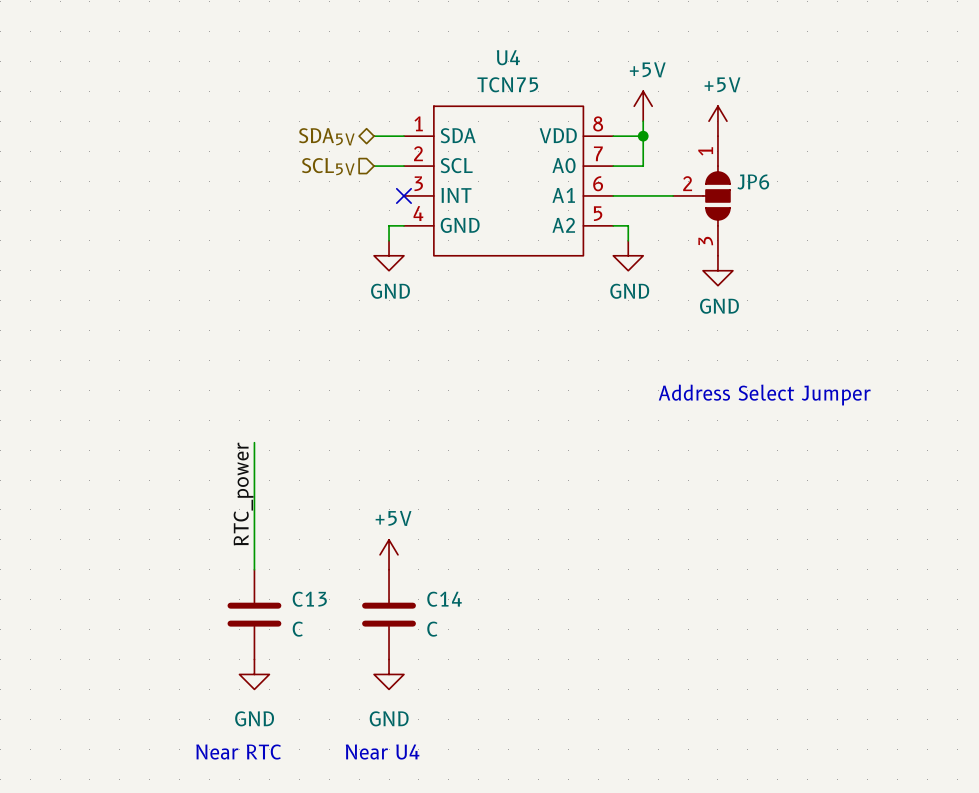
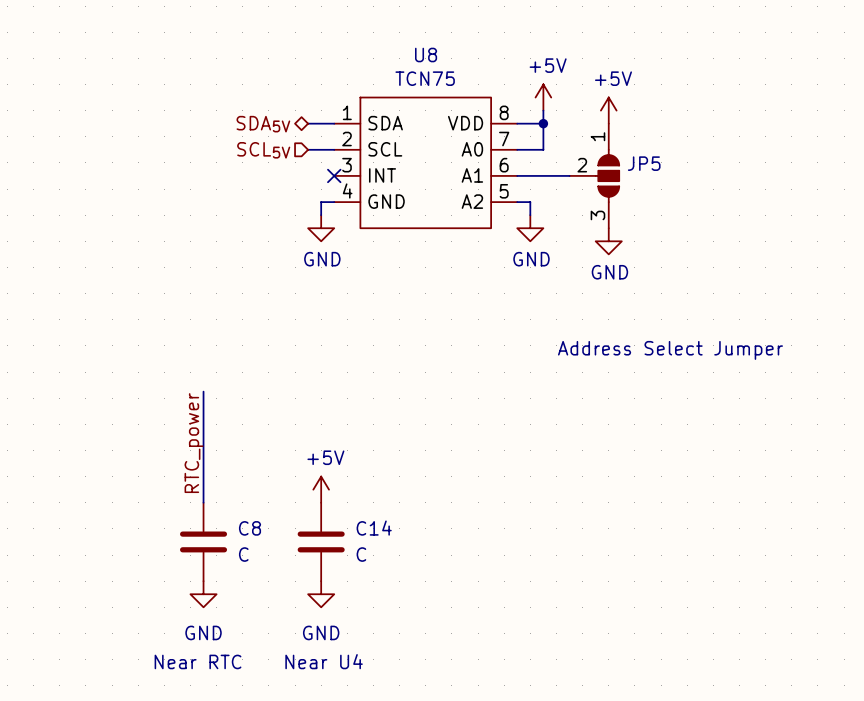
U4 name: U4 (508, 57) -> U8 (426, 55)
JP6 name: JP6 (753, 181) -> JP5 (644, 163)
C13 name: C13 (309, 599) -> C8 (250, 528)

